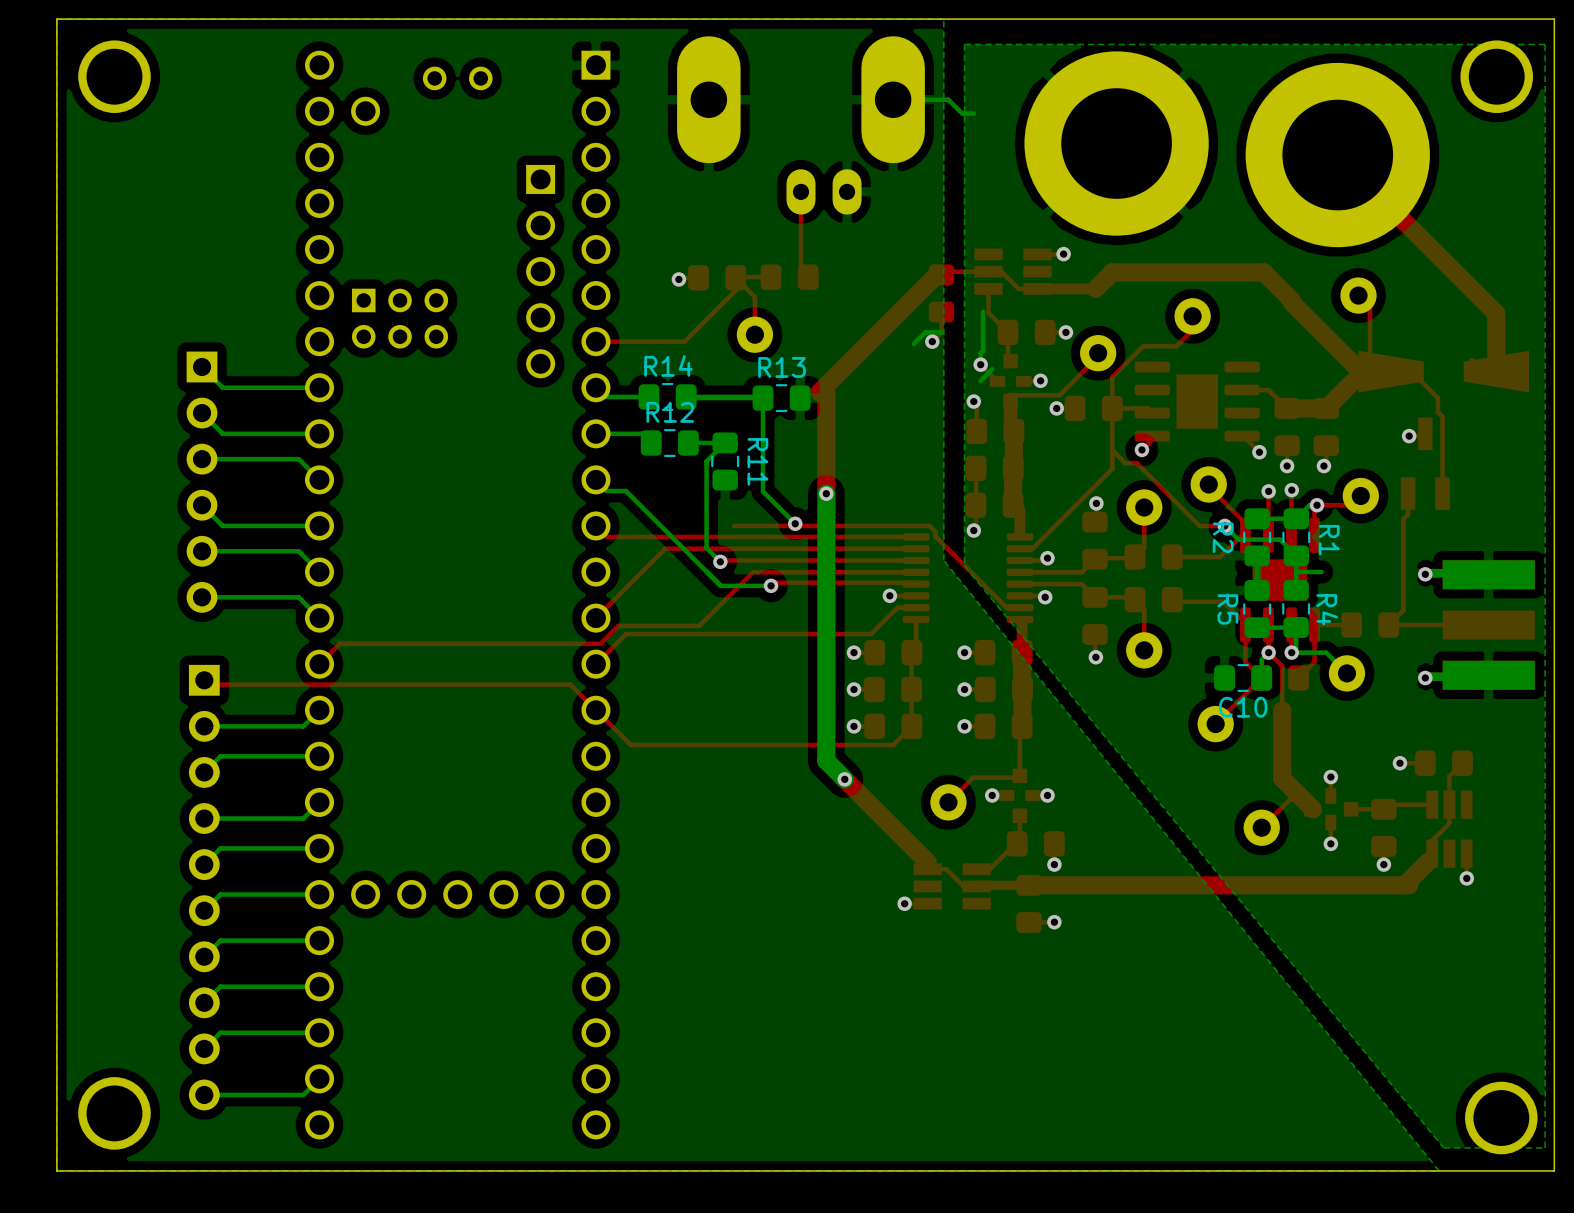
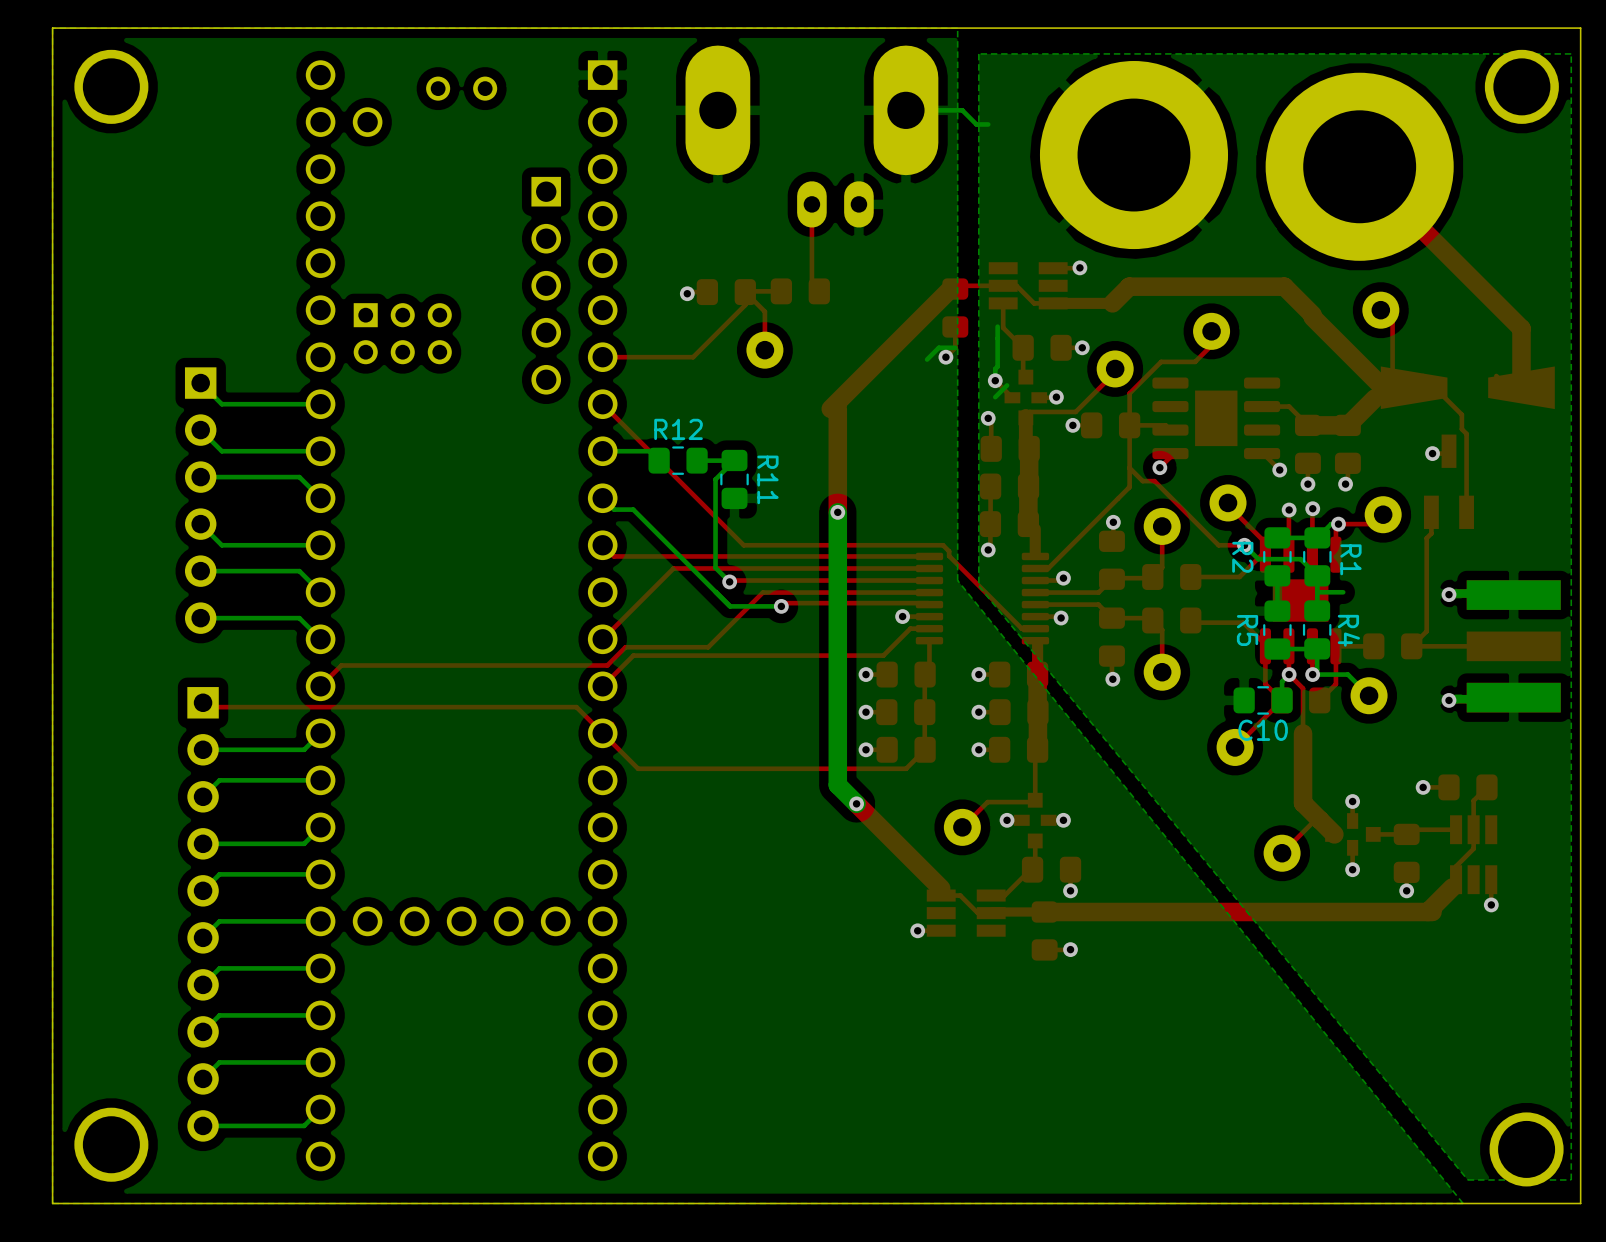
bottom track: (595, 387) (605, 396) (649, 396) -> none
top track: none -> (602, 404) (743, 545)
R14: (667, 396) -> none
bottom track: (768, 396) (686, 396) (762, 398) (762, 491) (795, 523) -> none
R13: (781, 398) -> none
via: (795, 523) -> none

